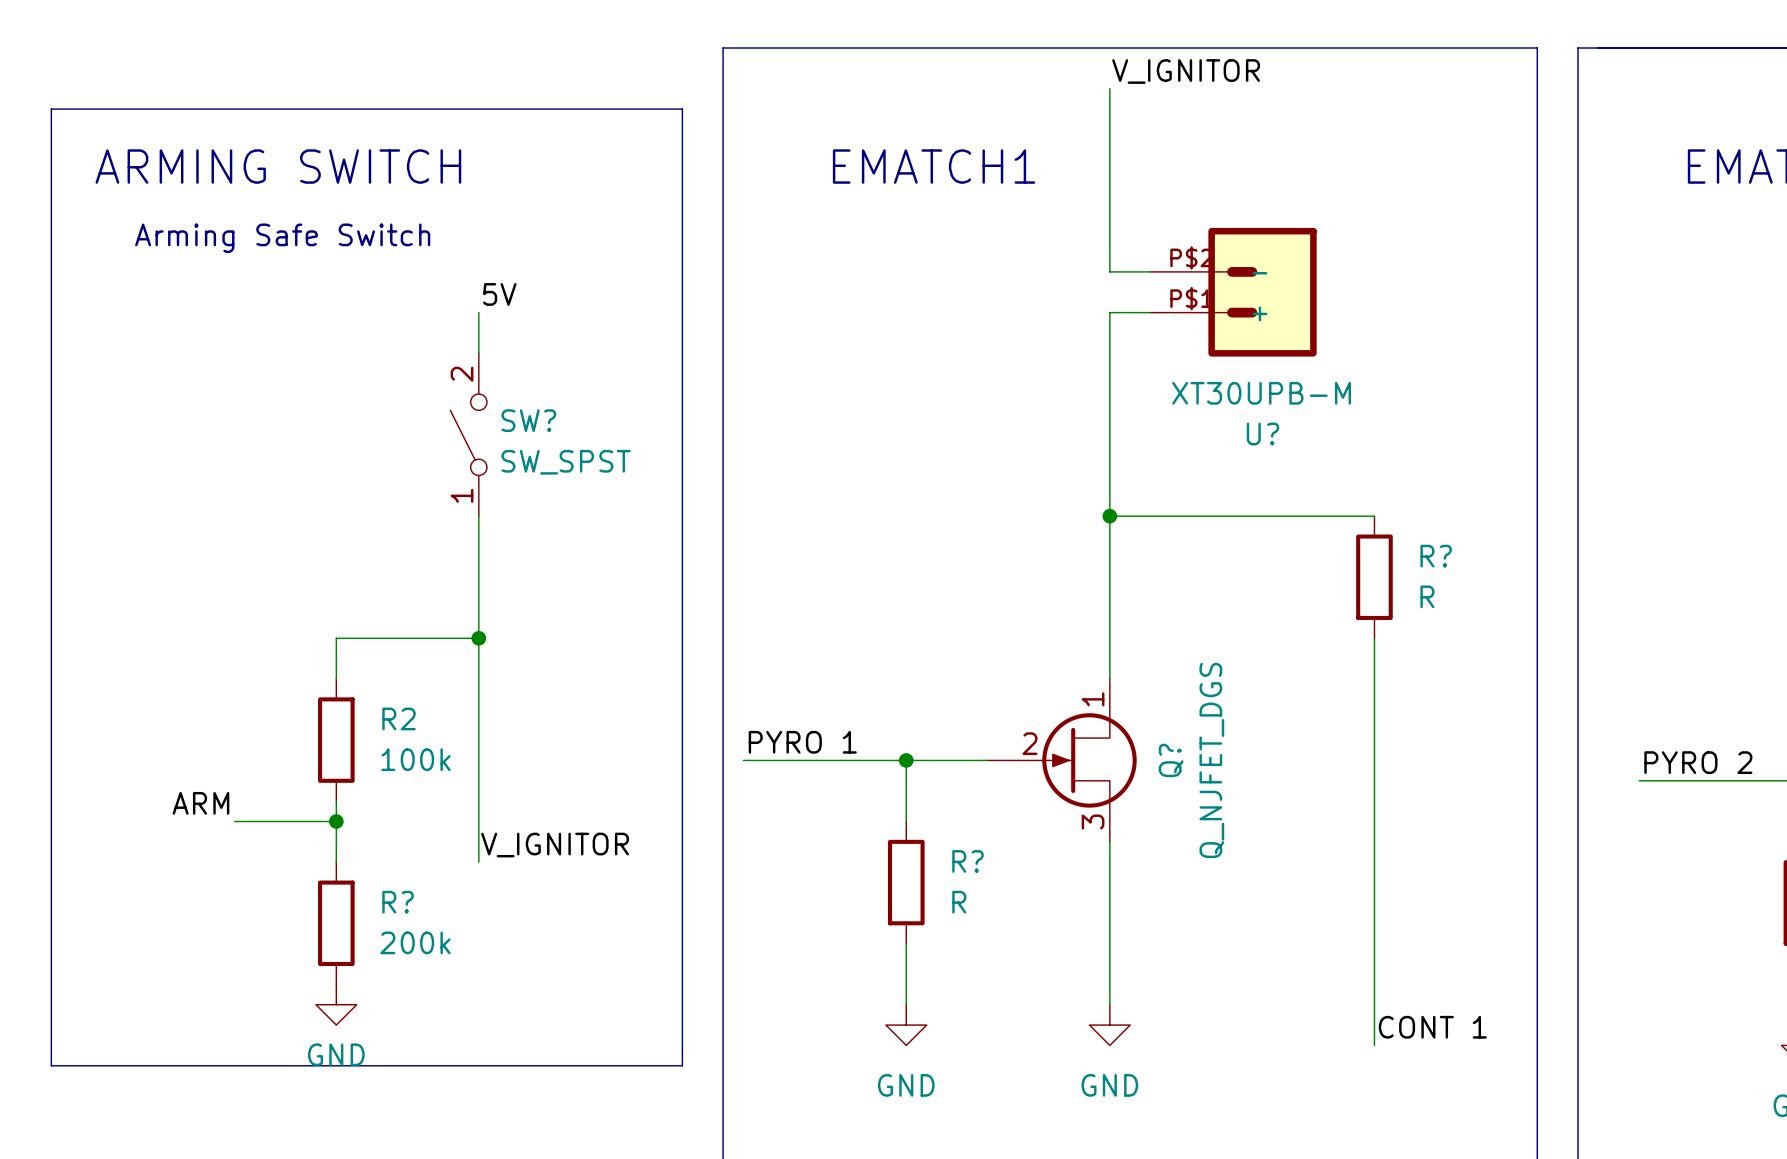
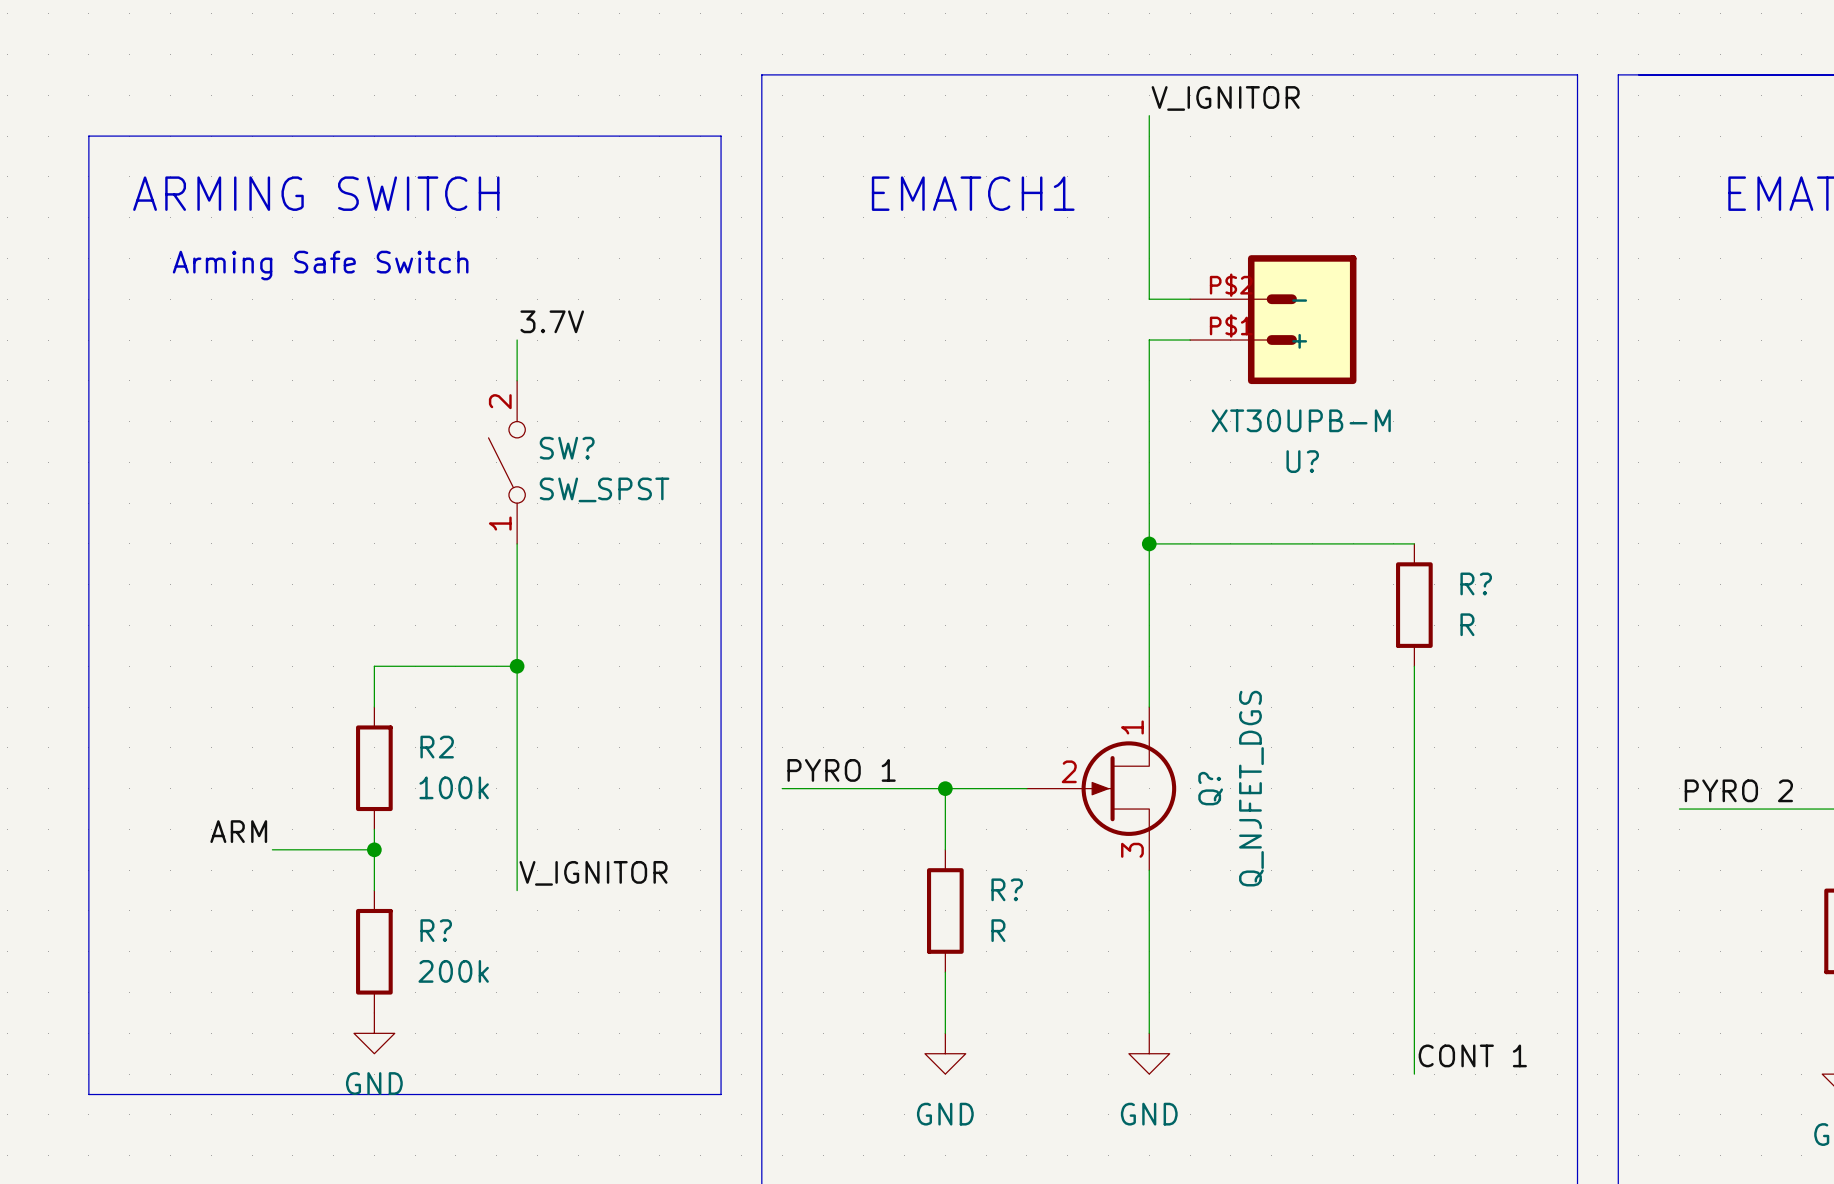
label: 5V (499, 294) -> 3.7V (552, 321)

